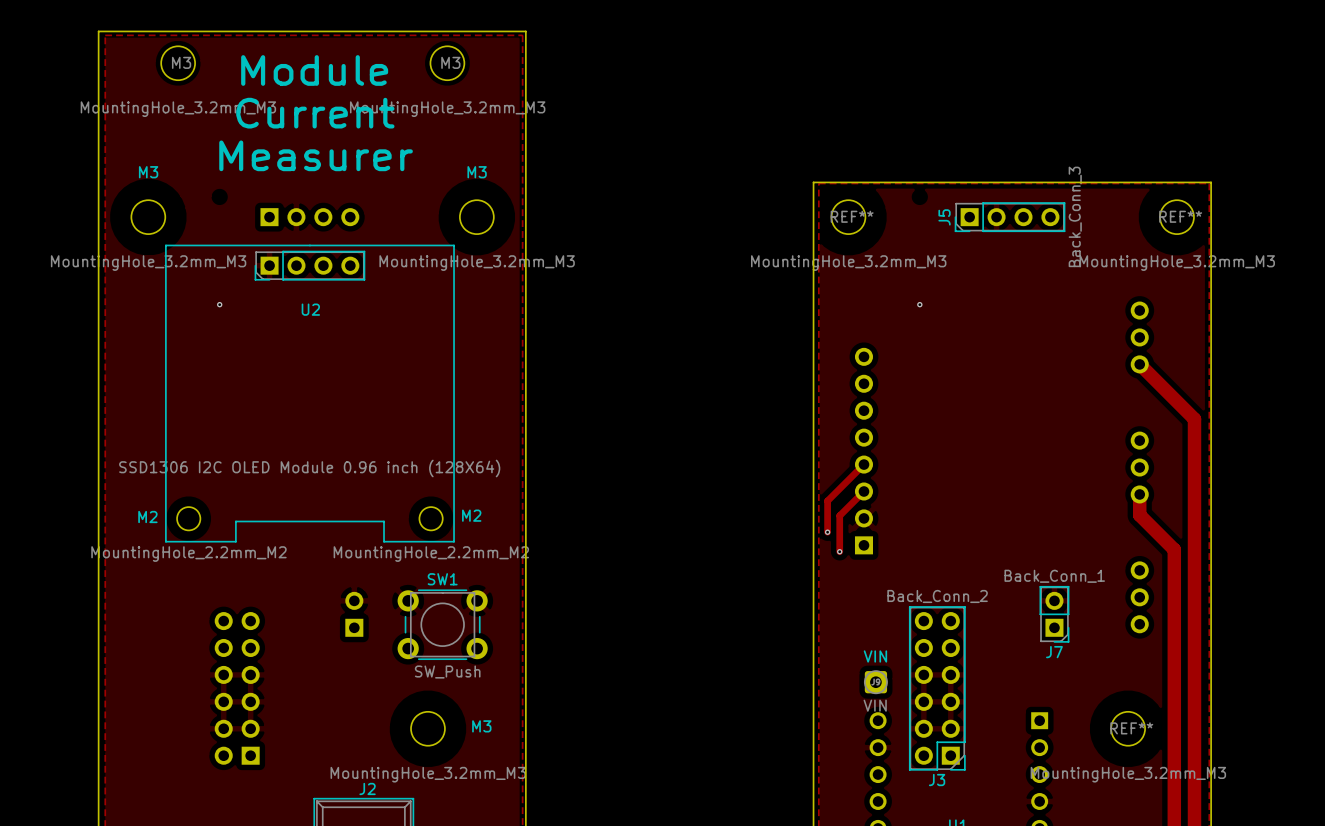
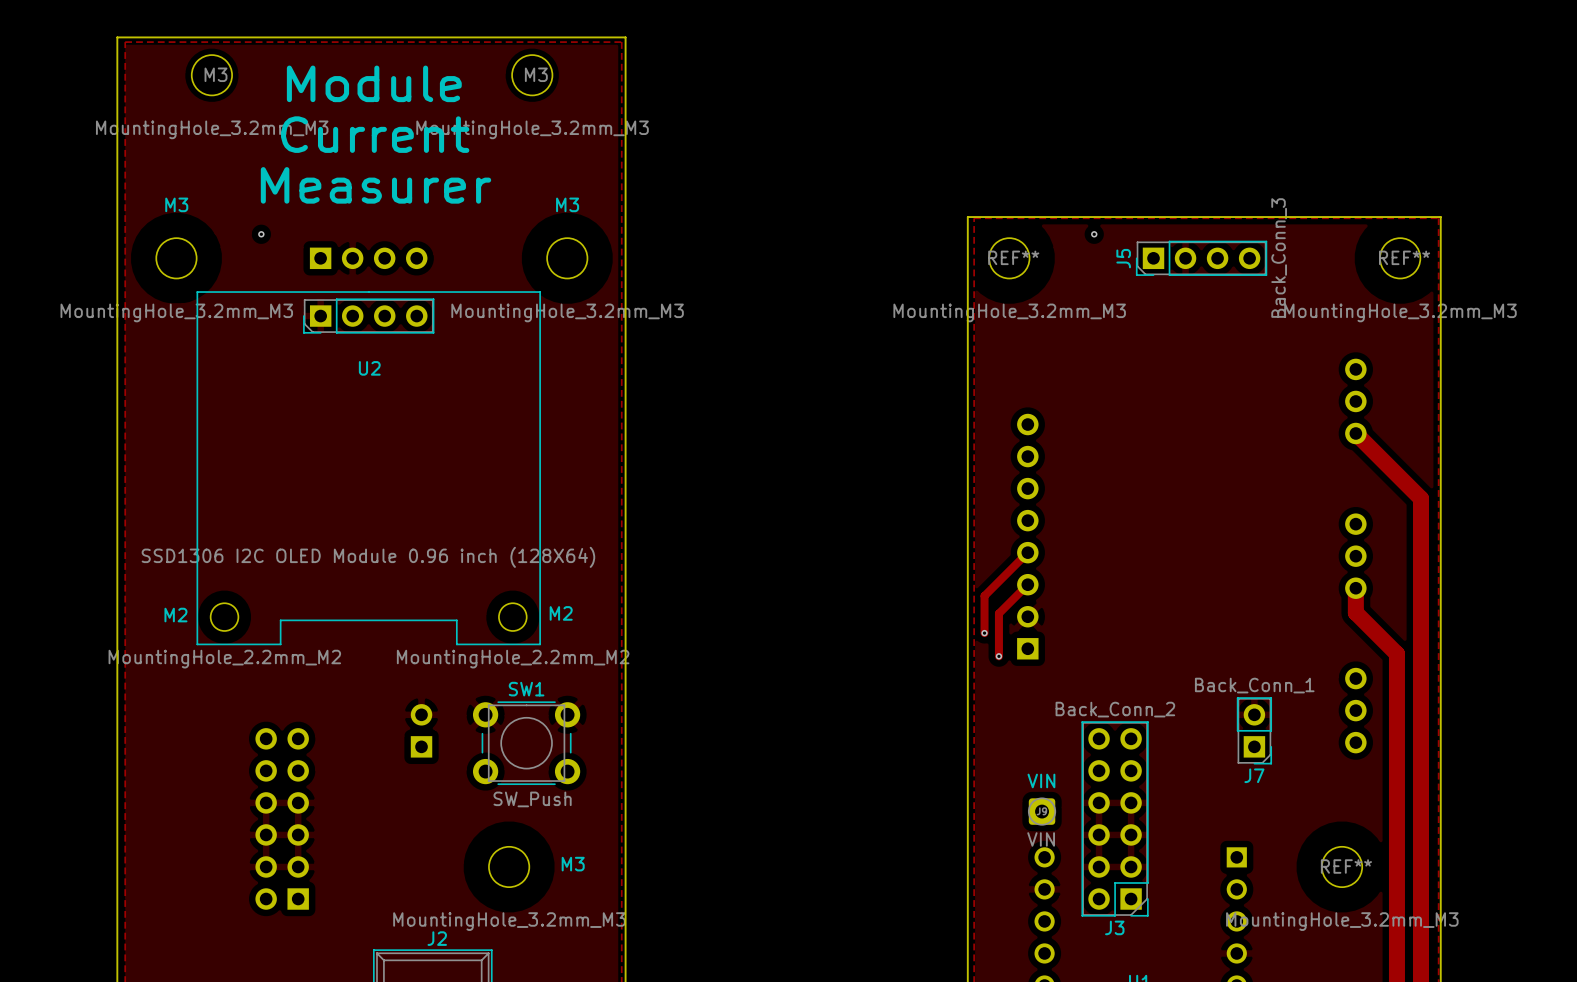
via: none -> (261, 234)
via: none -> (1094, 234)
via: (219, 304) -> none
via: (919, 304) -> none

